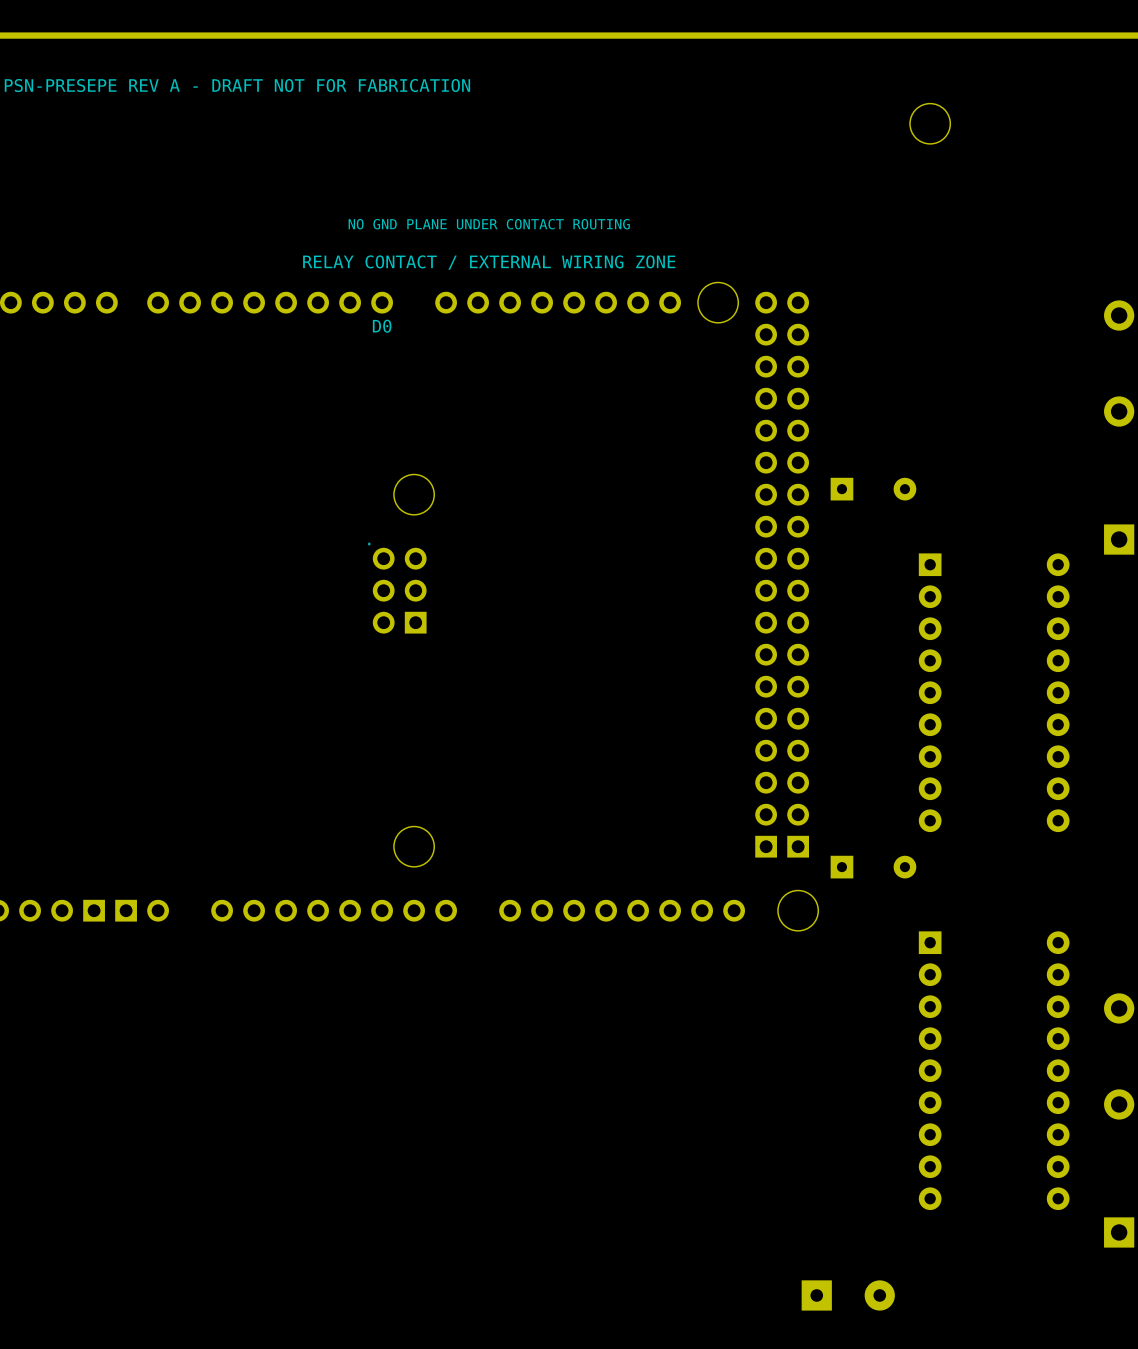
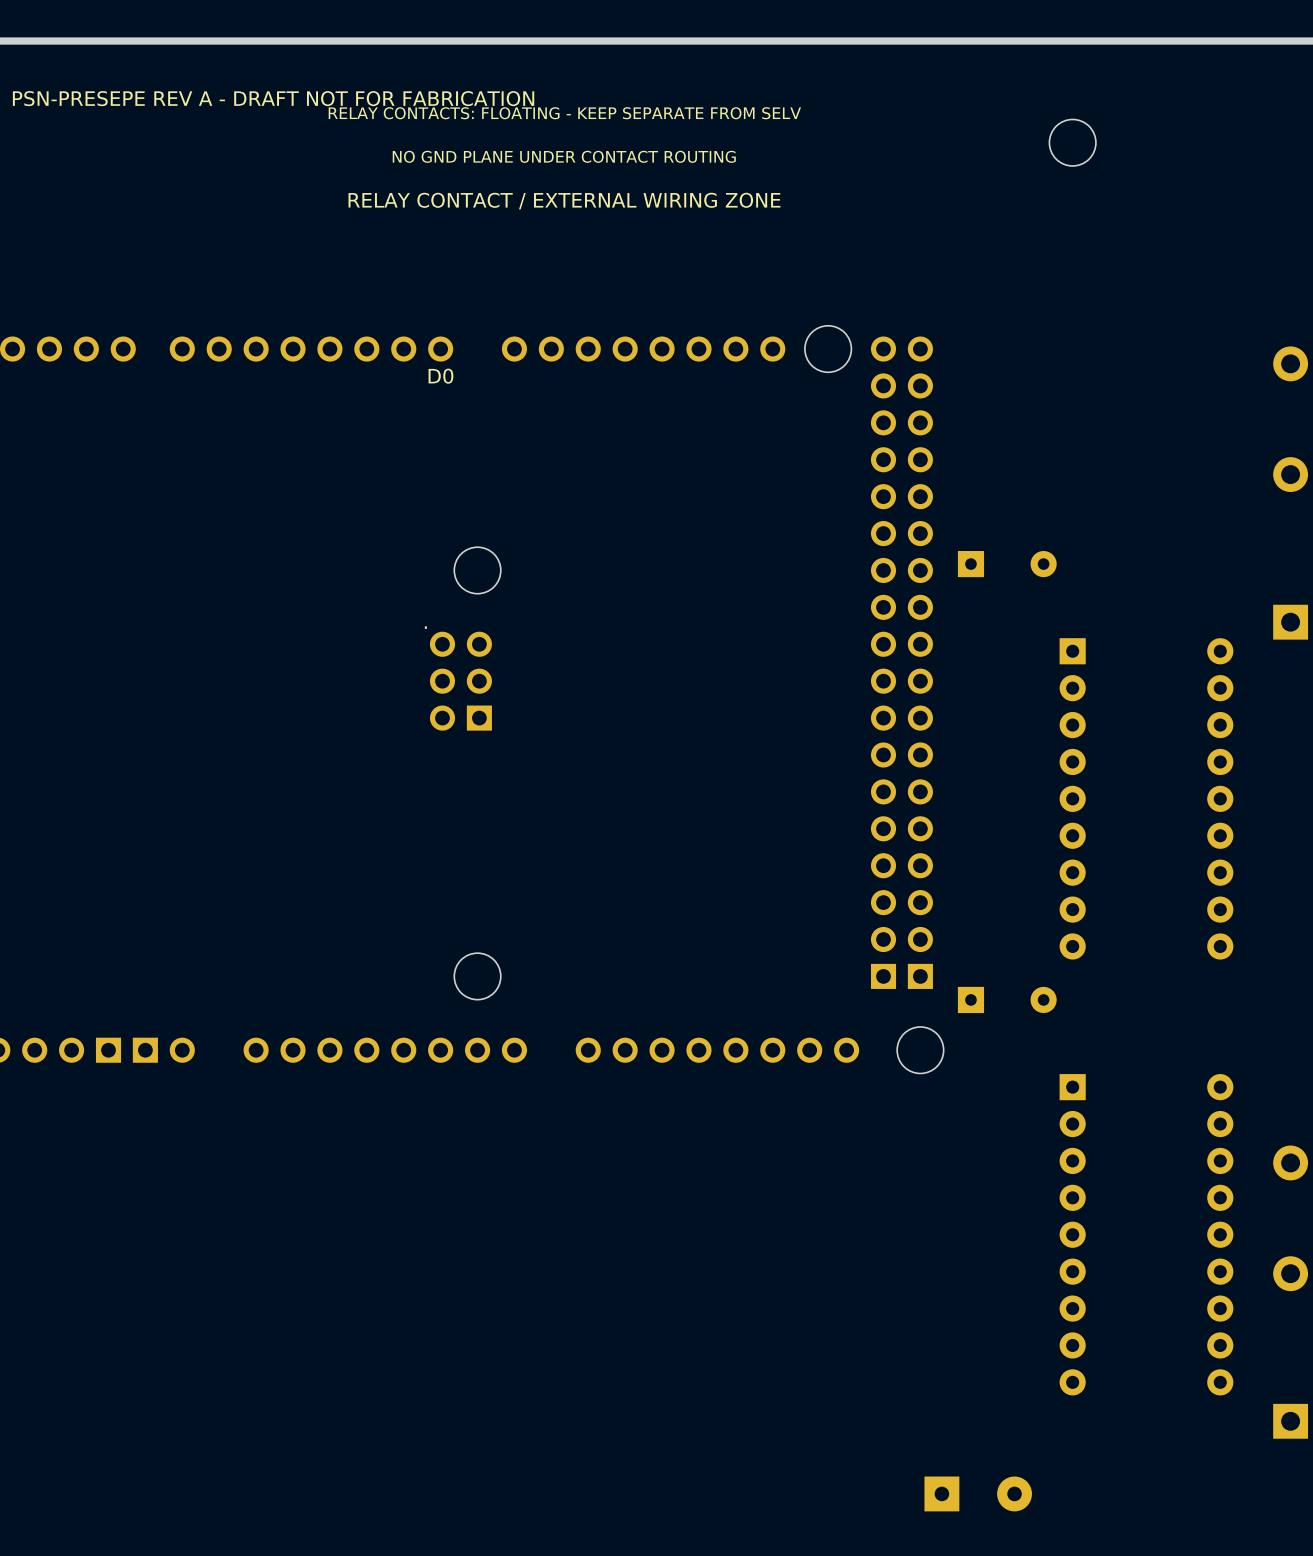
text: none -> RELAY CONTACTS: FLOATING - KEEP SEPARATE FROM SELV (564, 113)
text position: NO GND PLANE UNDER CONTACT ROUTING (489, 224) -> NO GND PLANE UNDER CONTACT ROUTING (564, 156)
text position: RELAY CONTACT / EXTERNAL WIRING ZONE (489, 262) -> RELAY CONTACT / EXTERNAL WIRING ZONE (564, 201)

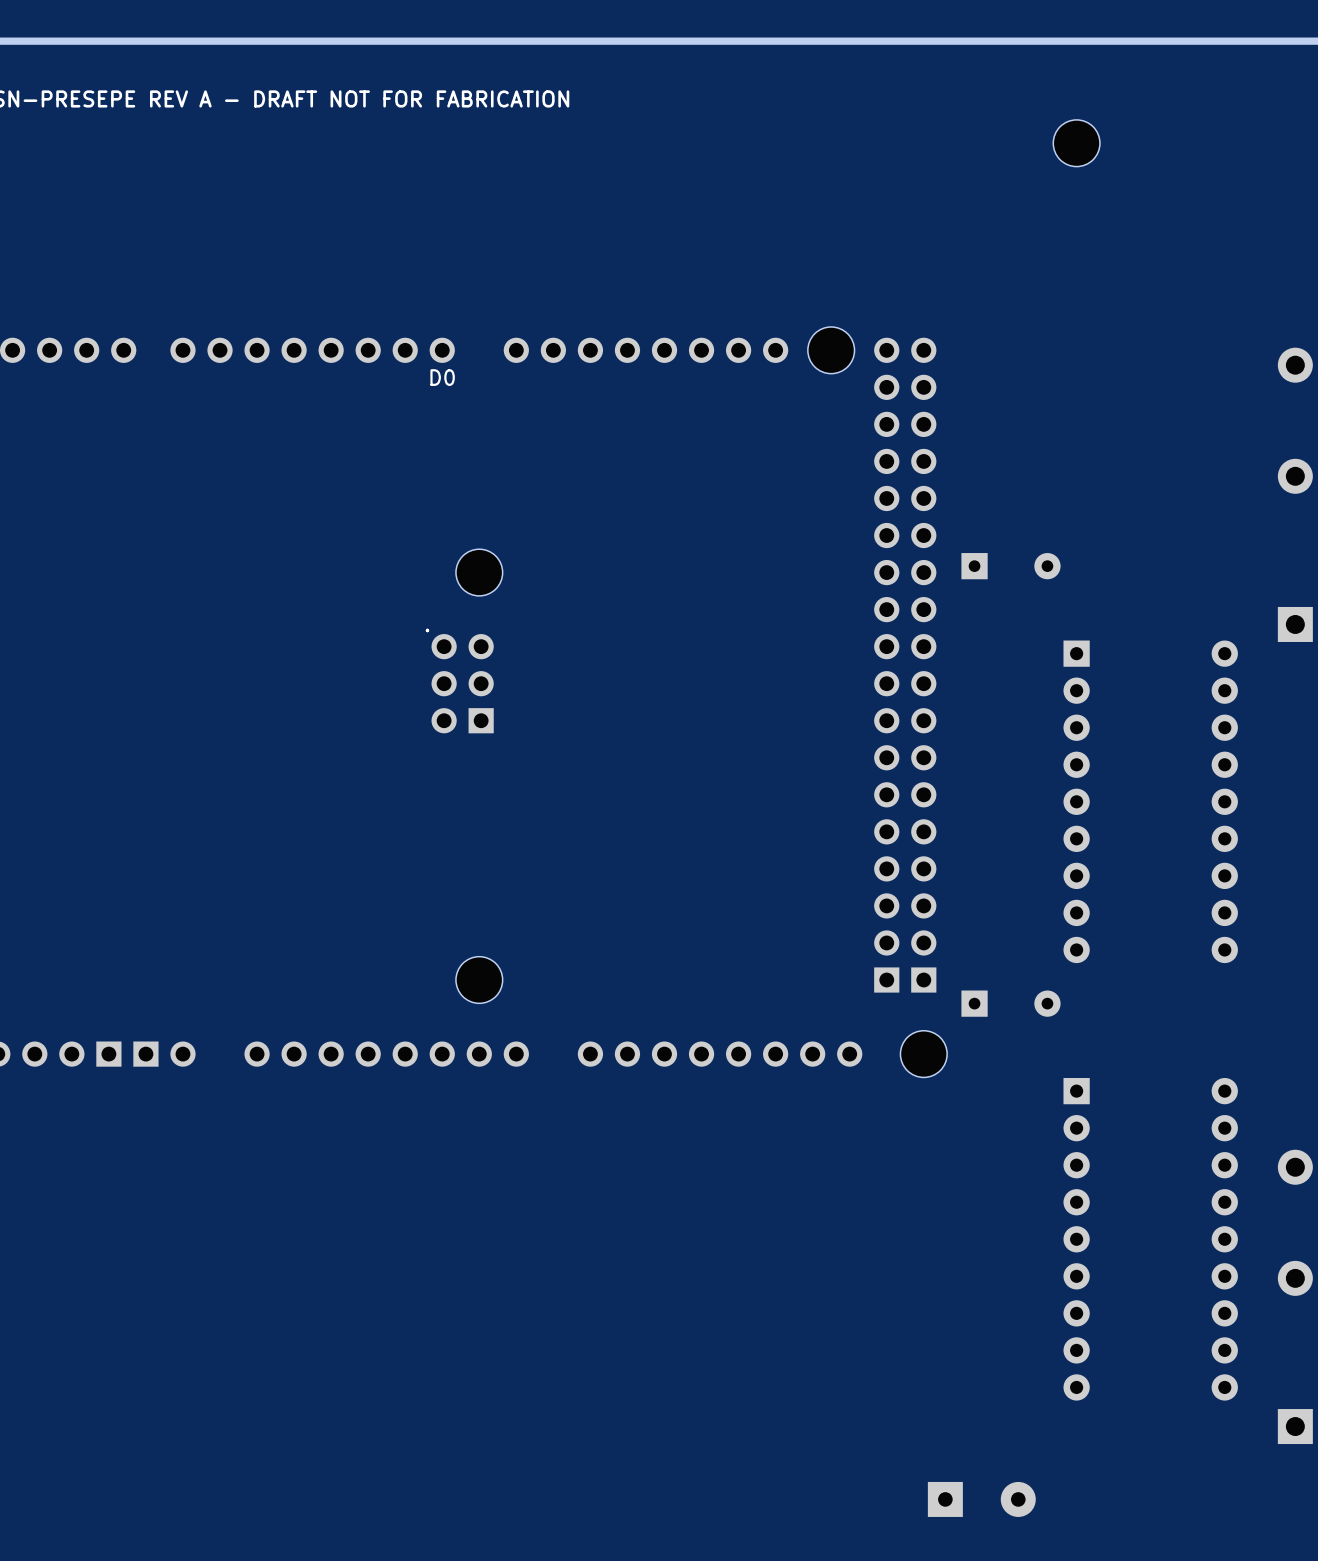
text: RELAY CONTACTS: FLOATING - KEEP SEPARATE FROM SELV (564, 113) -> none
text: NO GND PLANE UNDER CONTACT ROUTING (564, 156) -> none
text: RELAY CONTACT / EXTERNAL WIRING ZONE (564, 201) -> none

